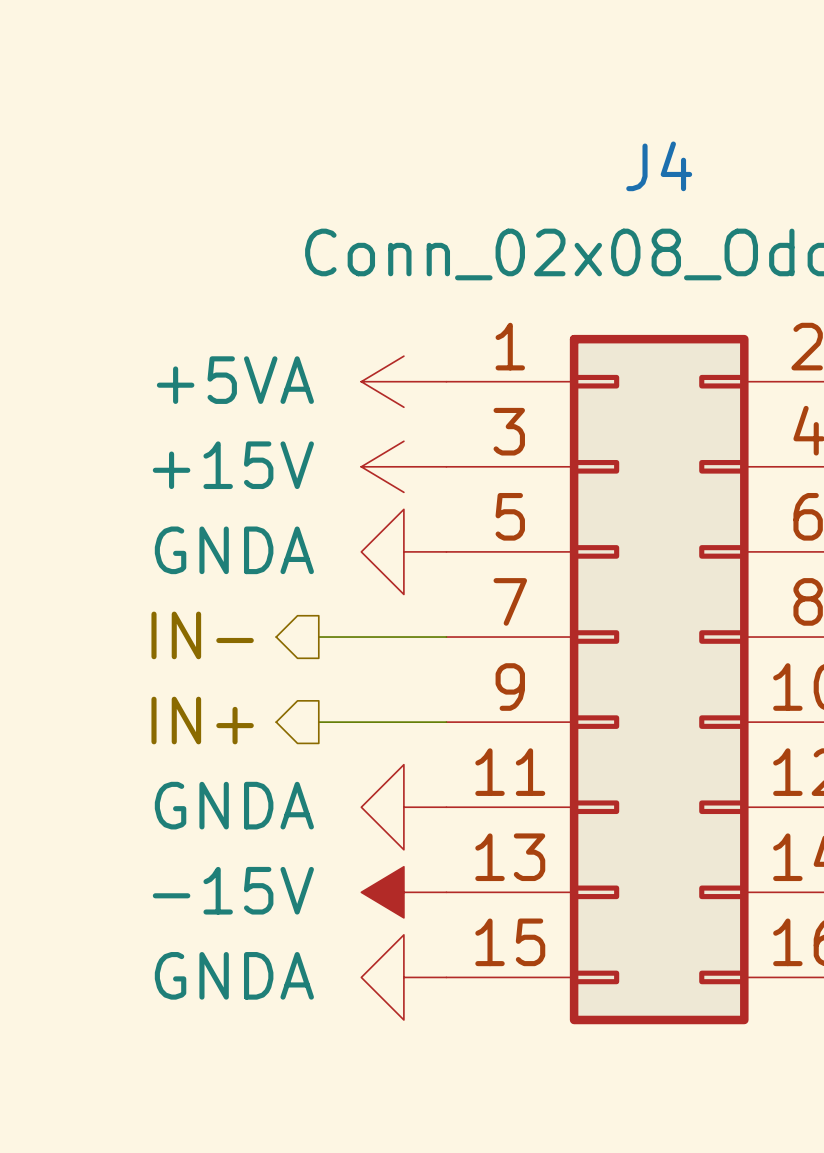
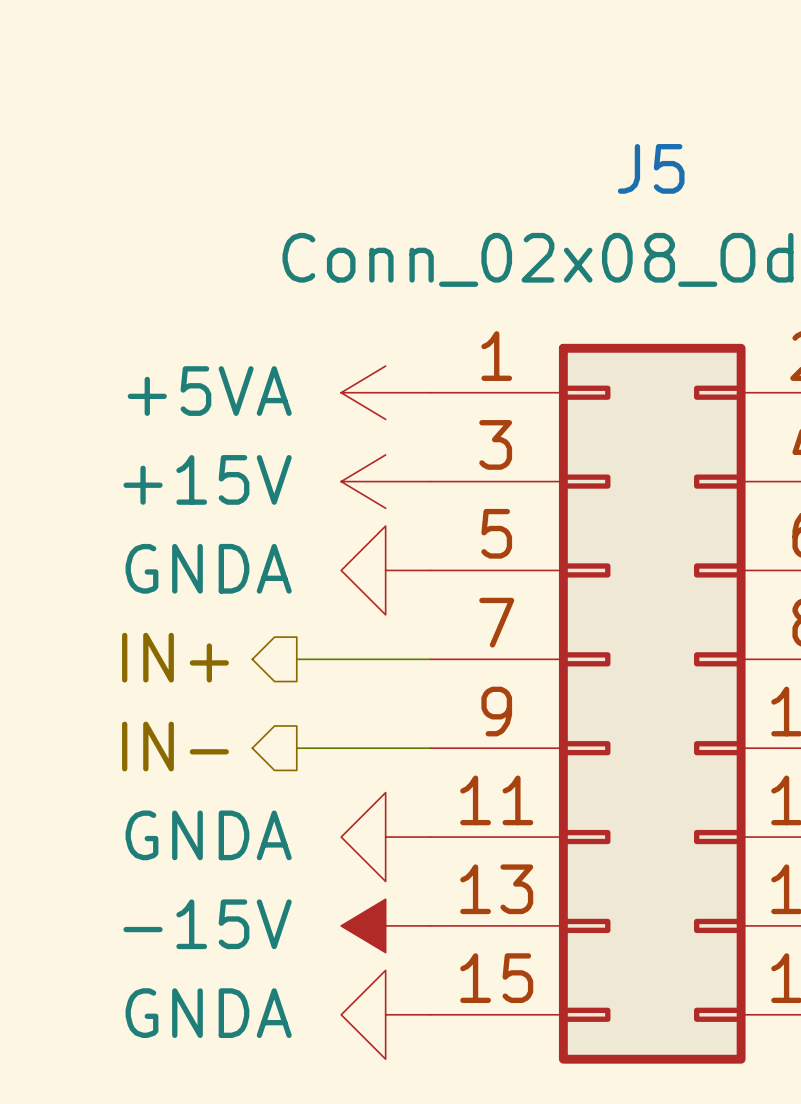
J4 name: J4 (659, 166) -> J5 (651, 168)
hierarchical label: IN- (202, 635) -> IN+ (175, 657)
hierarchical label: IN+ (202, 720) -> IN- (175, 746)

